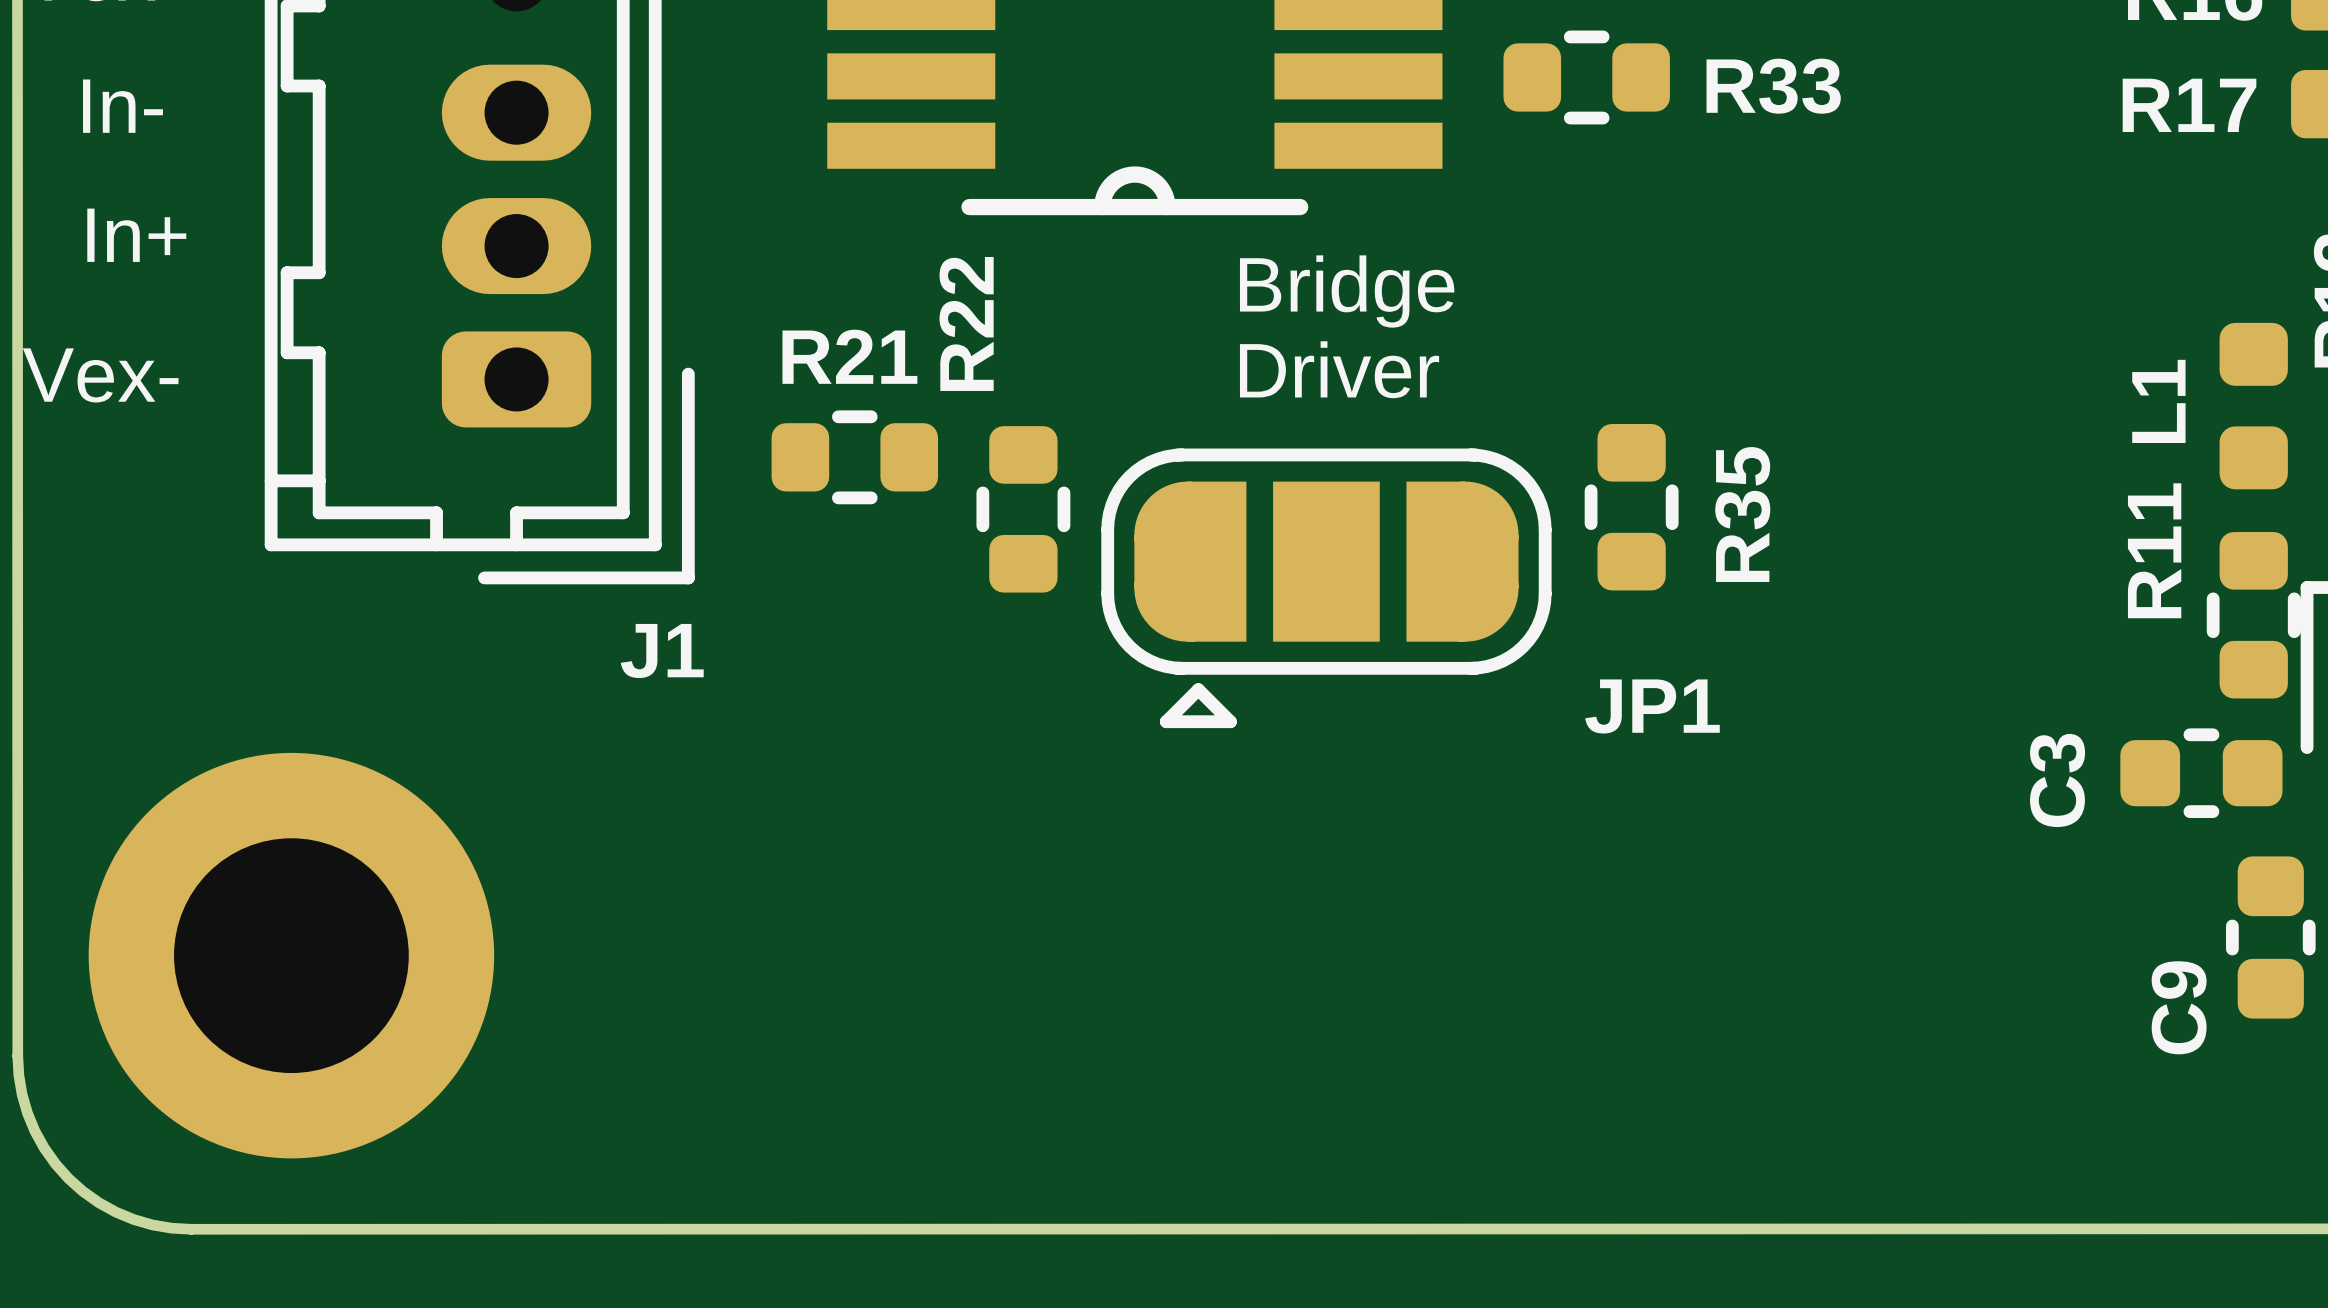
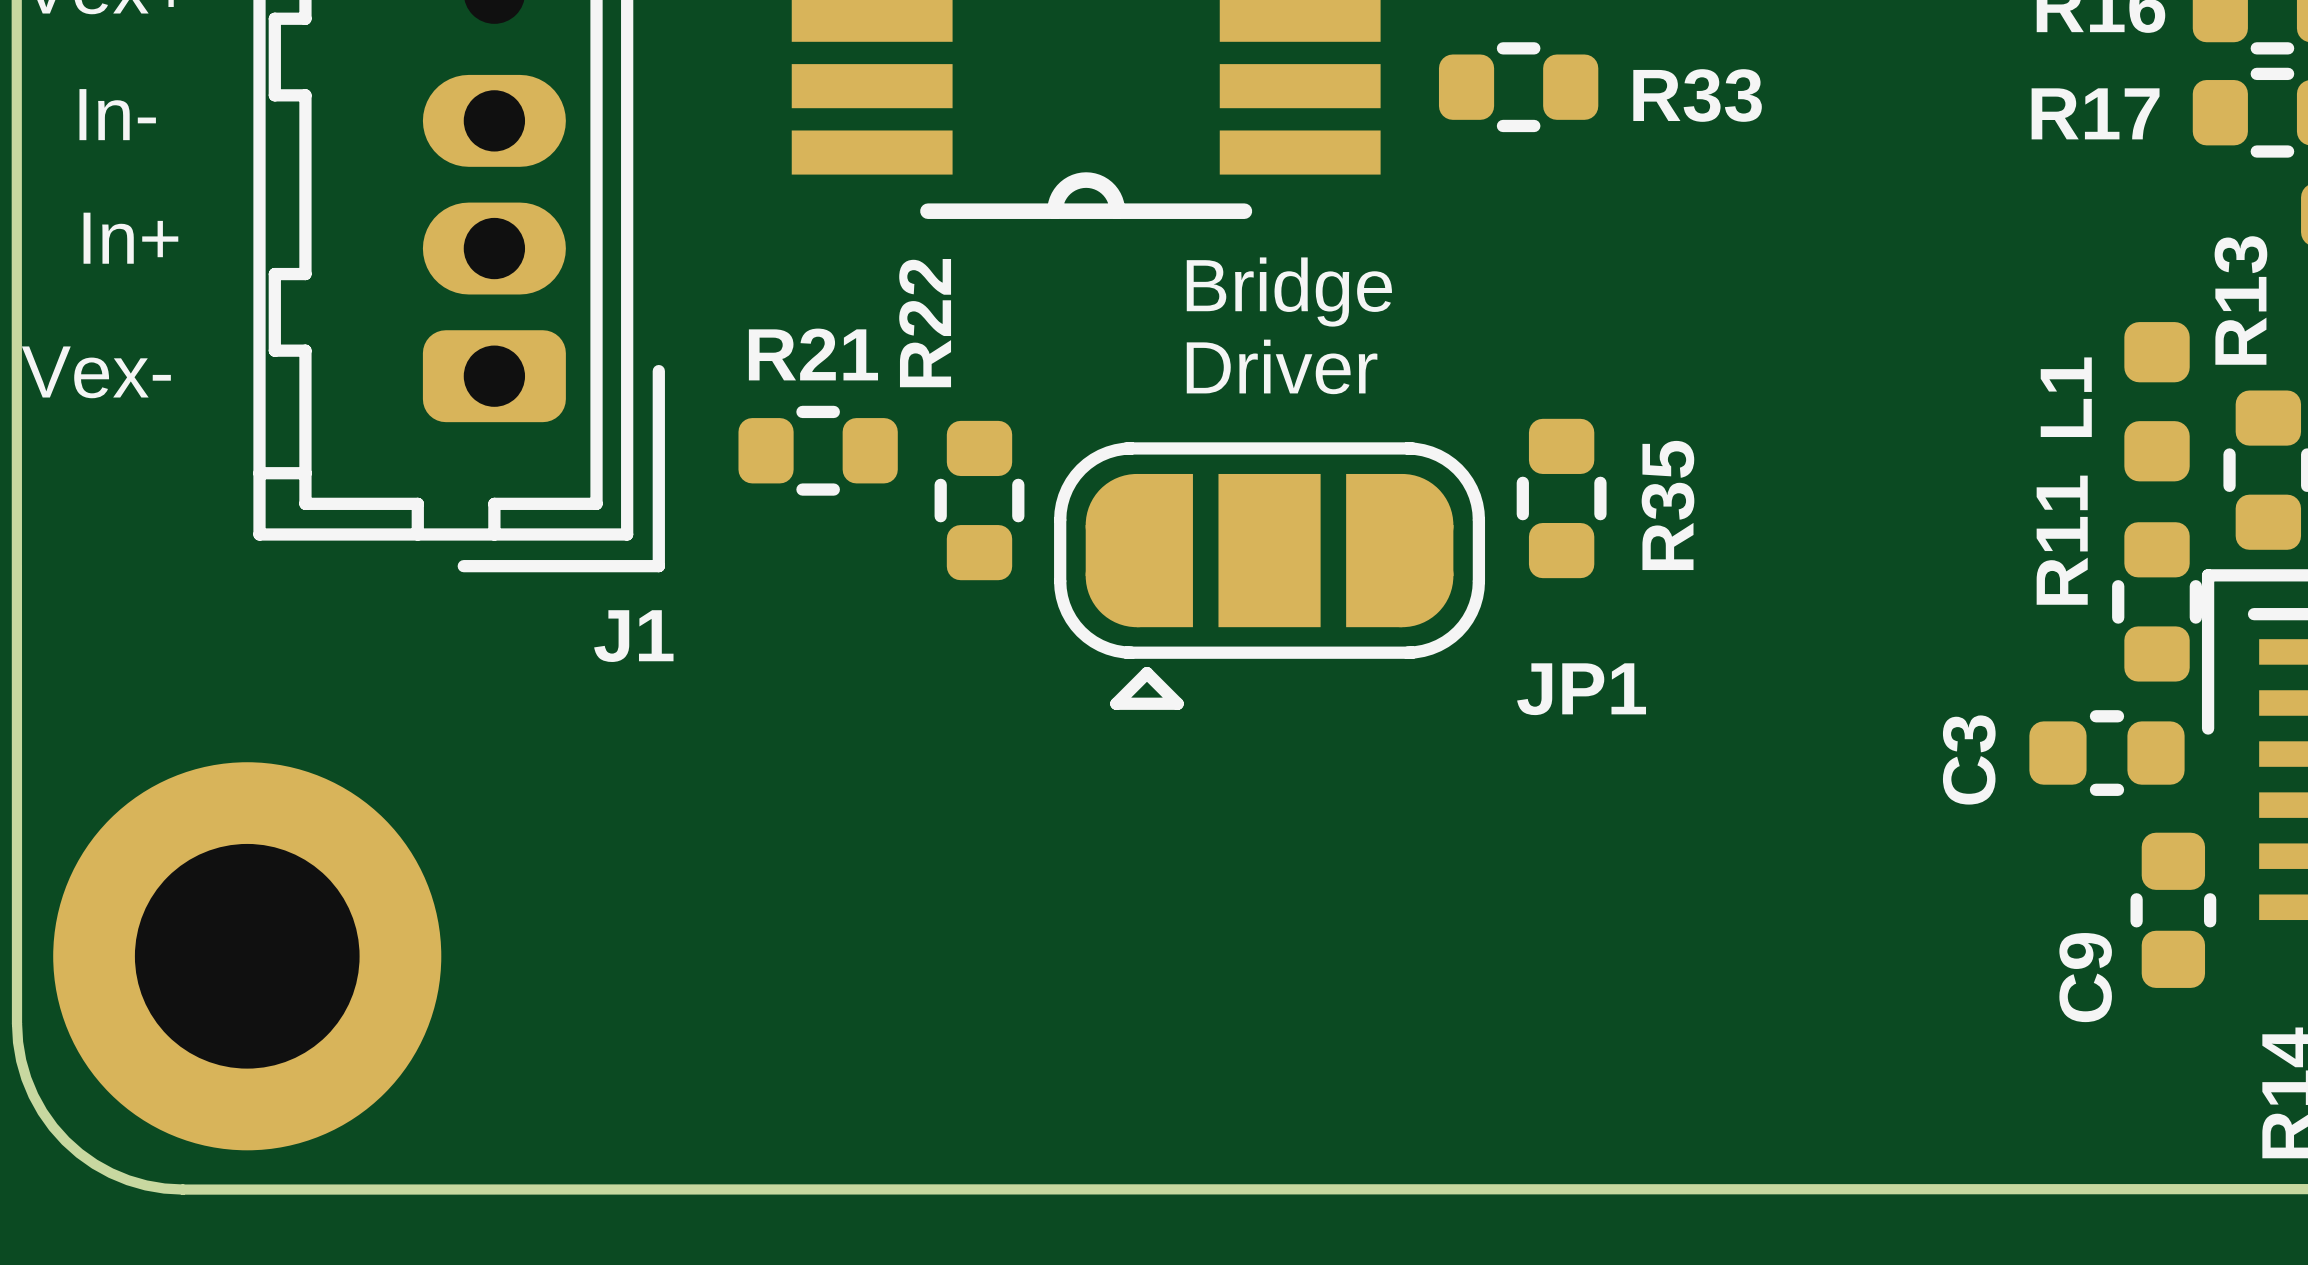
part position: (291, 955) -> (247, 956)

